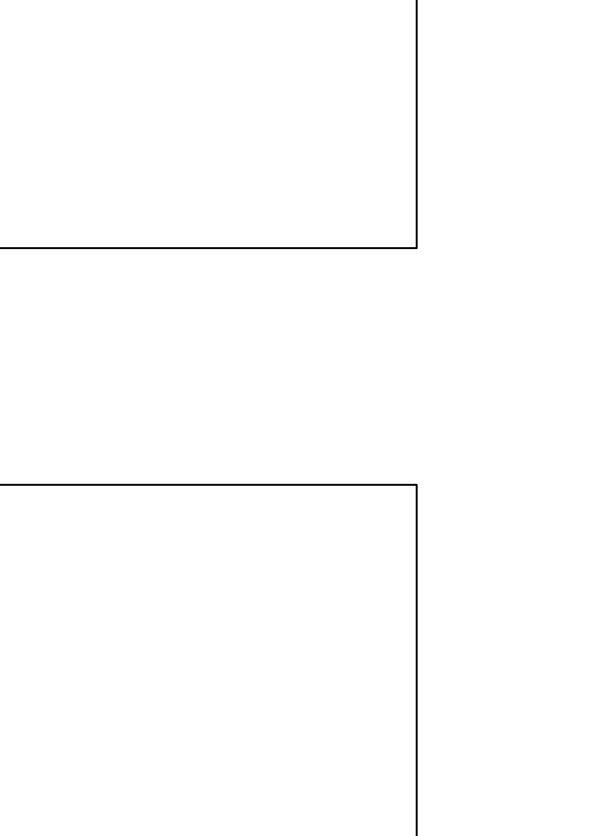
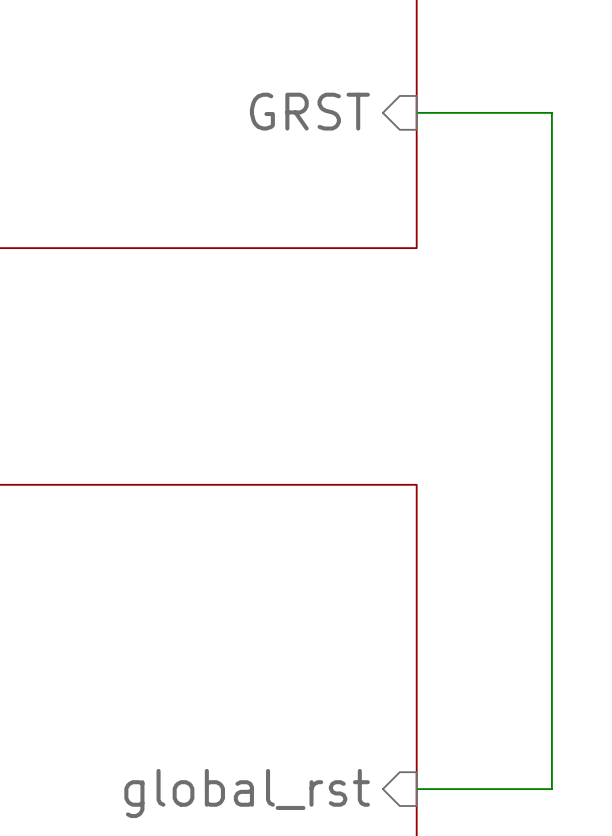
sheet pin: none -> GRST (309, 111)
wire: none -> (416, 112) (551, 112) (551, 789) (416, 789)
sheet pin: none -> global_rst (247, 793)

